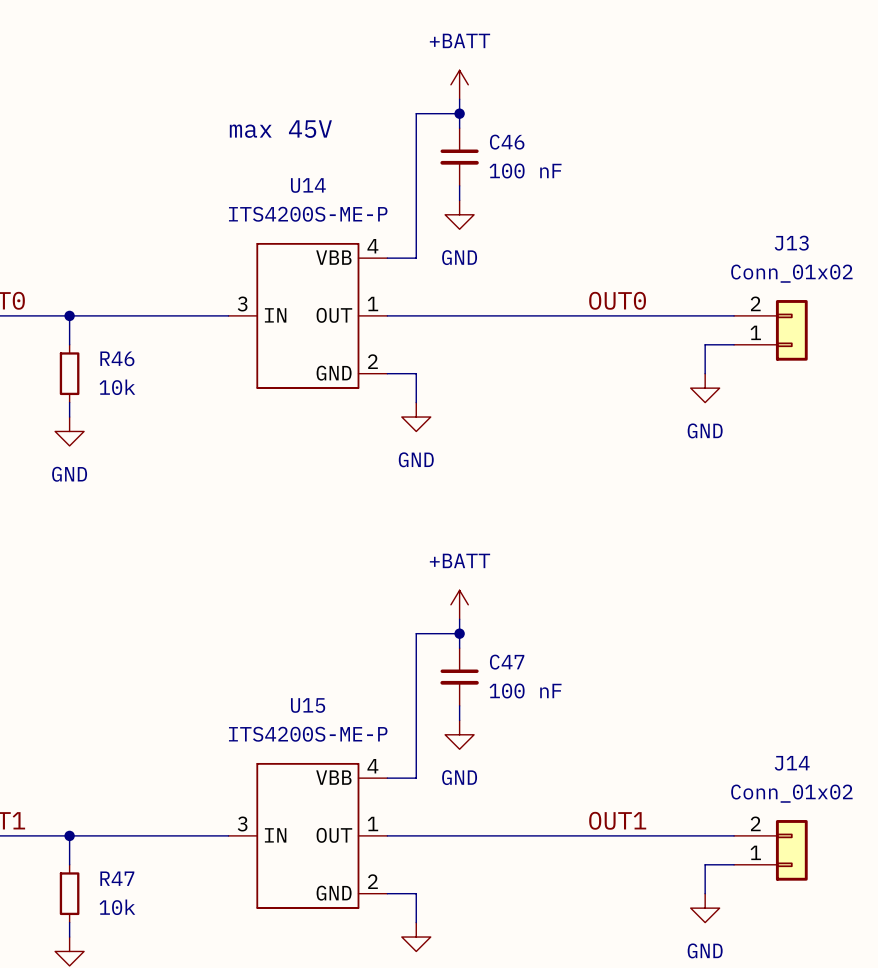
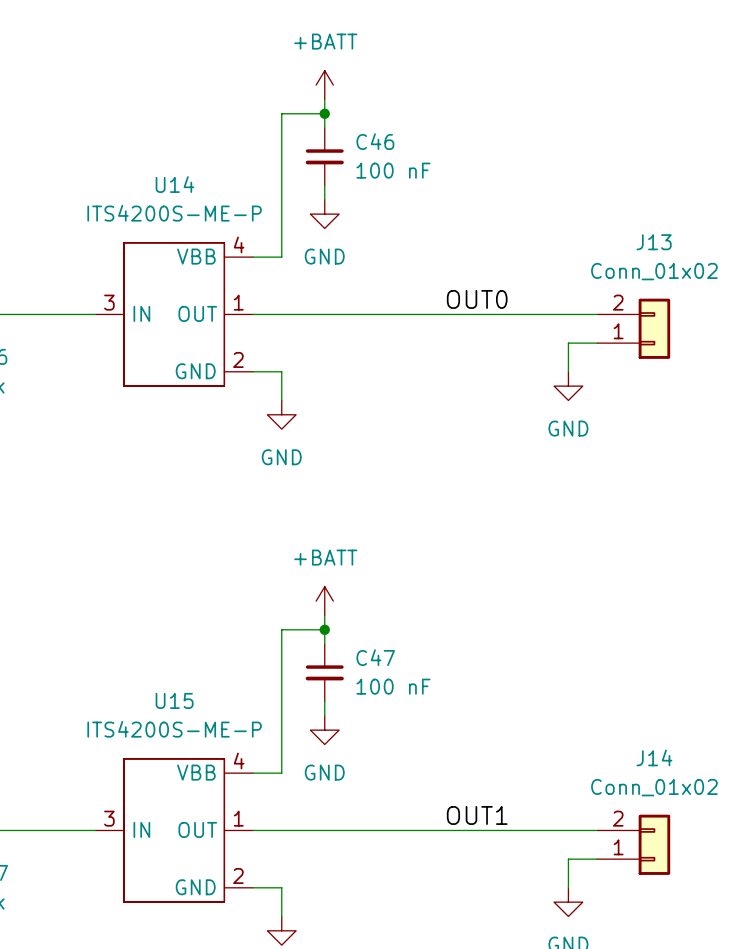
text: max 45V (280, 129) -> none

